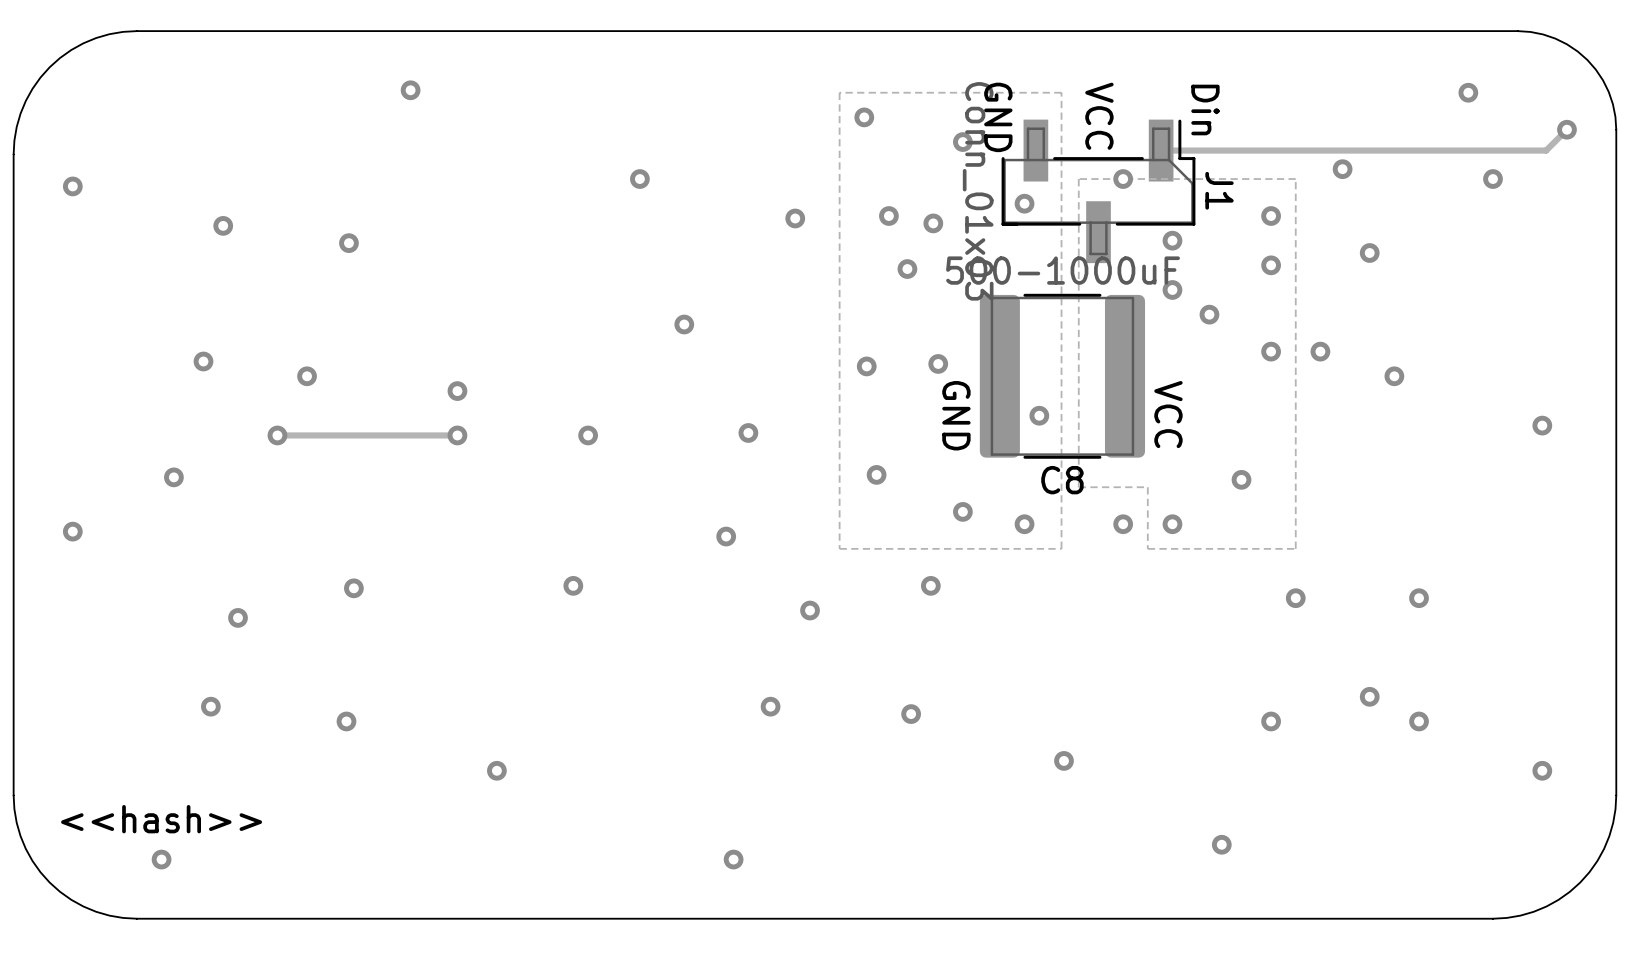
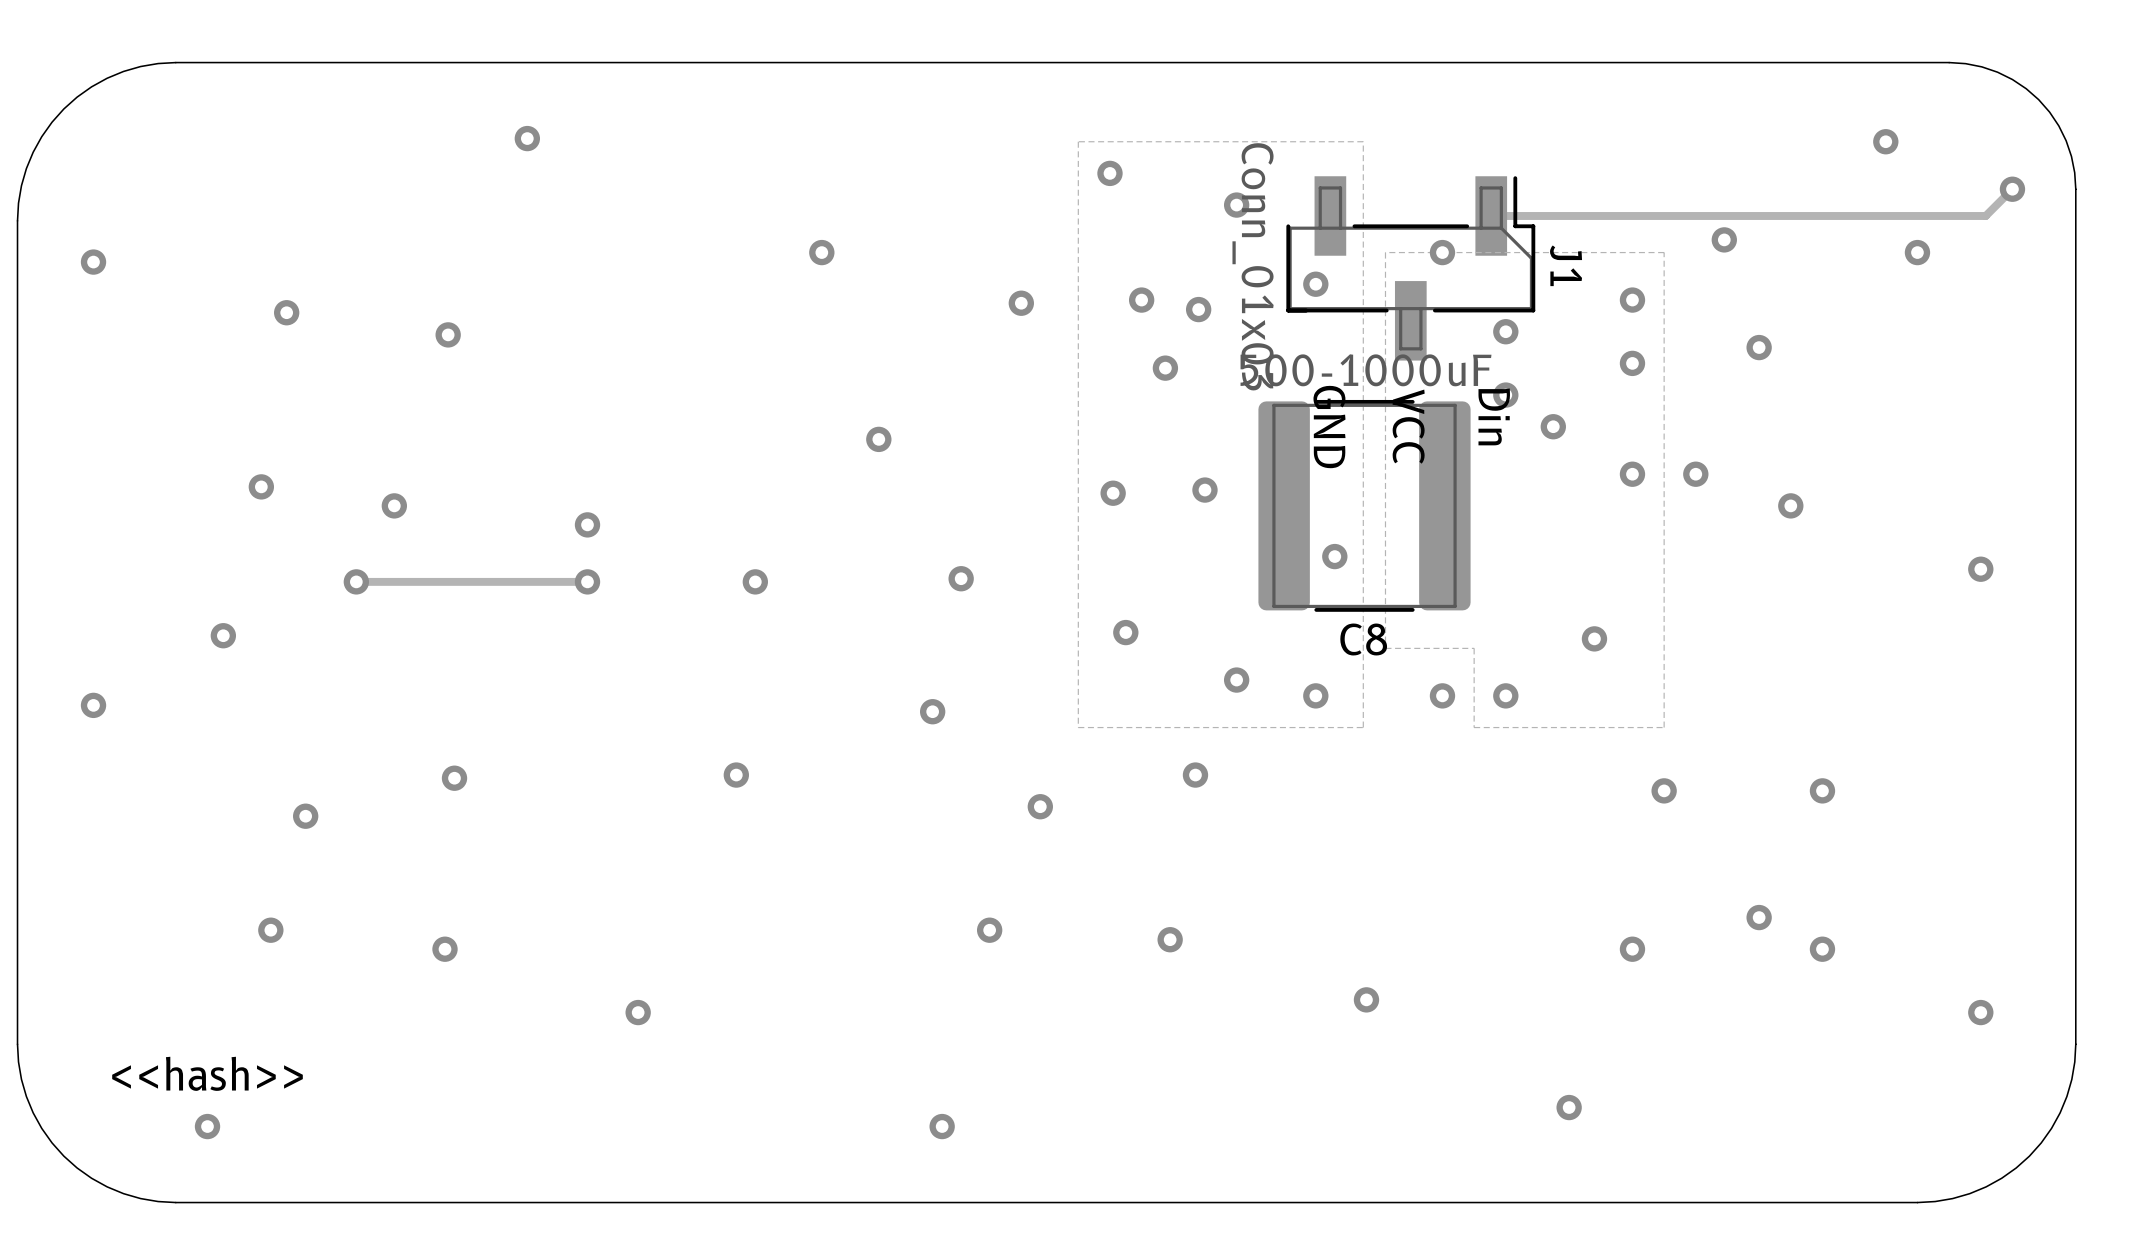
text position: Din (1205, 110) -> Din (1494, 416)
text: VCC (1099, 116) -> none
text: GND (998, 117) -> none
text: none -> VCC (1408, 426)
text: none -> GND (1329, 427)
text: VCC (1168, 414) -> none
text: GND (956, 415) -> none

